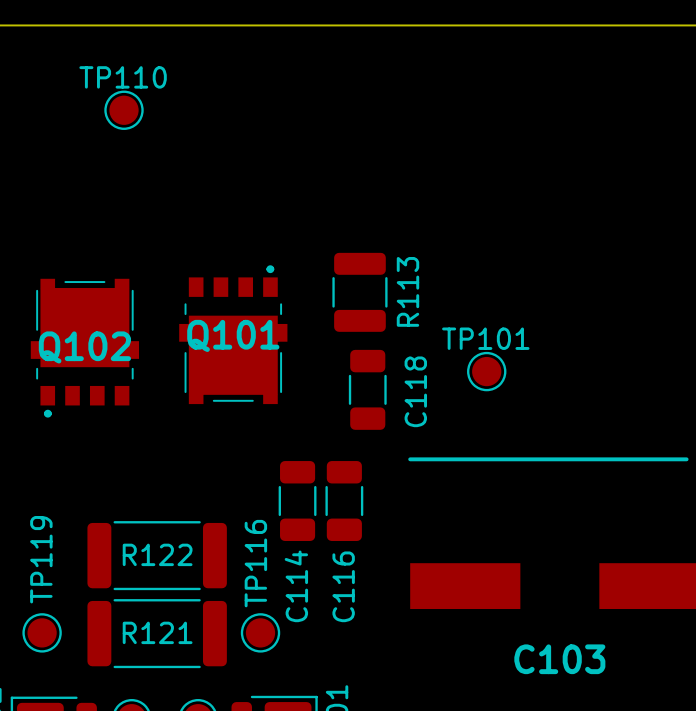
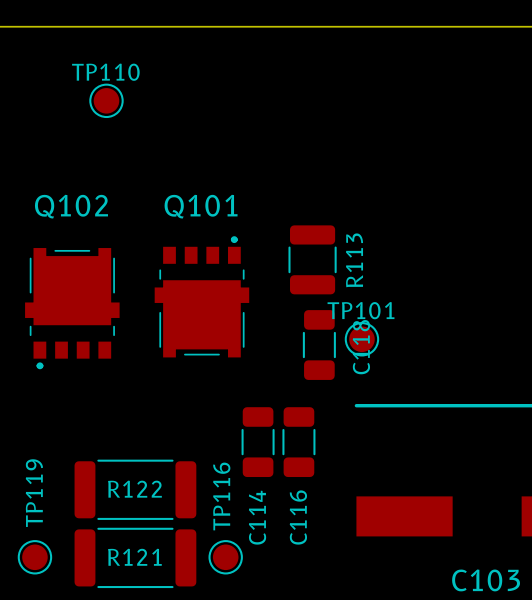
Q101 name position: Q101 (233, 335) -> Q101 (201, 206)
Q102 name position: Q102 (84, 347) -> Q102 (71, 206)
TP101 position: (486, 371) -> (361, 339)

